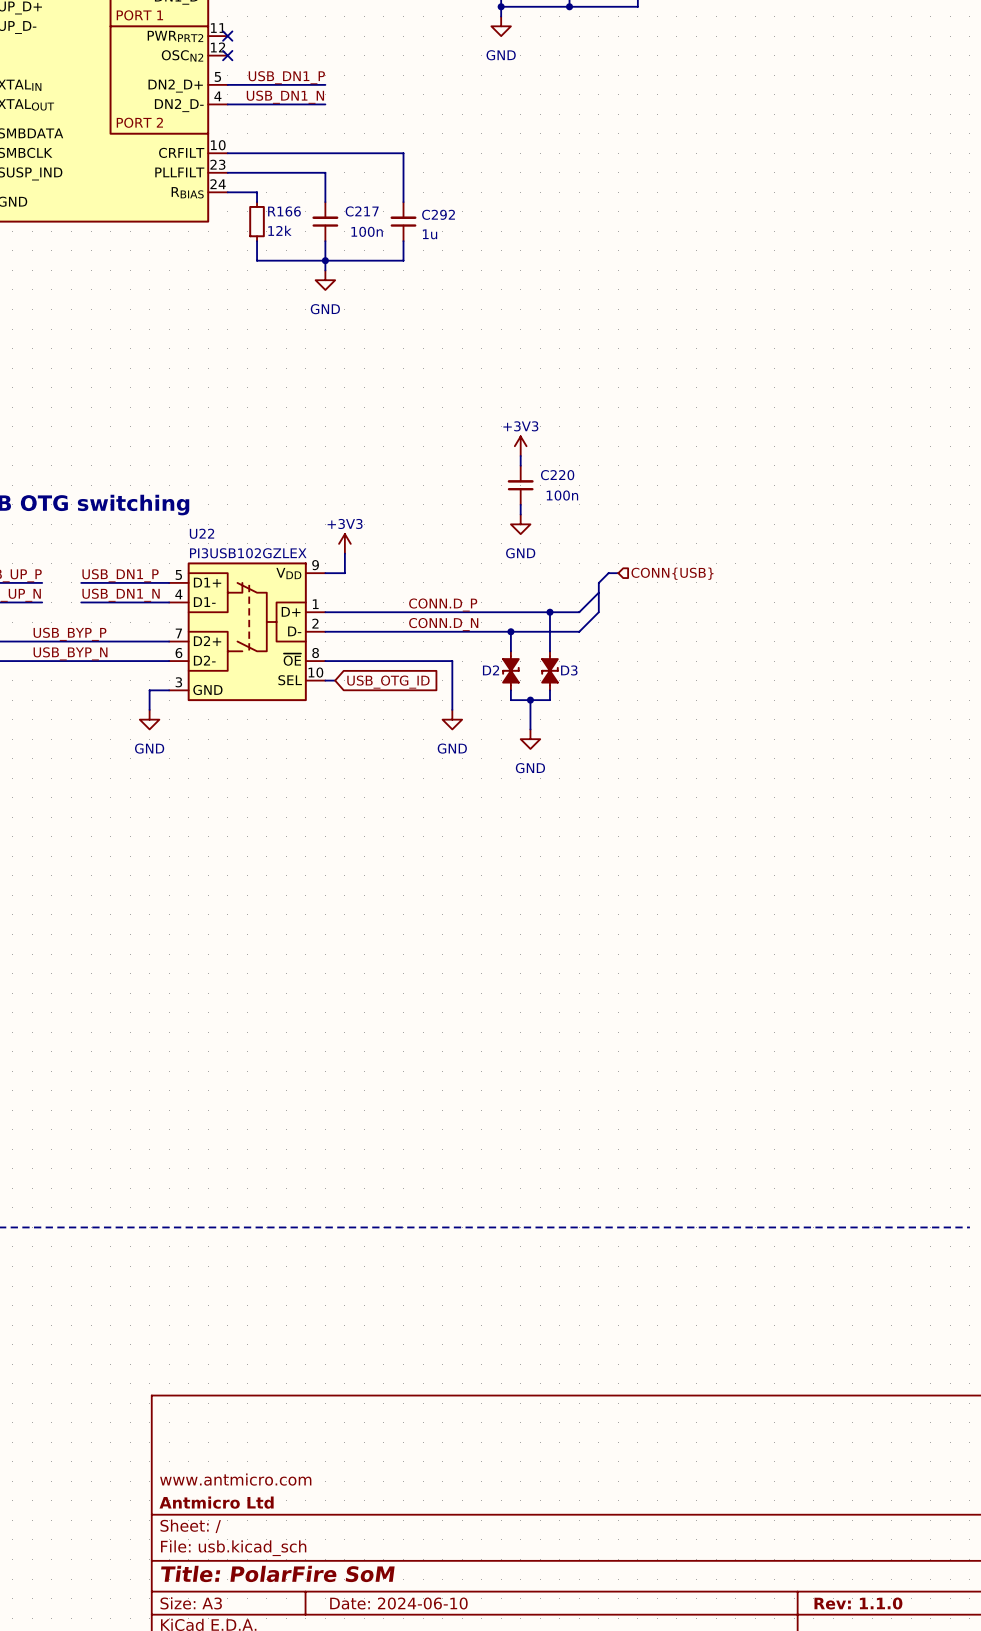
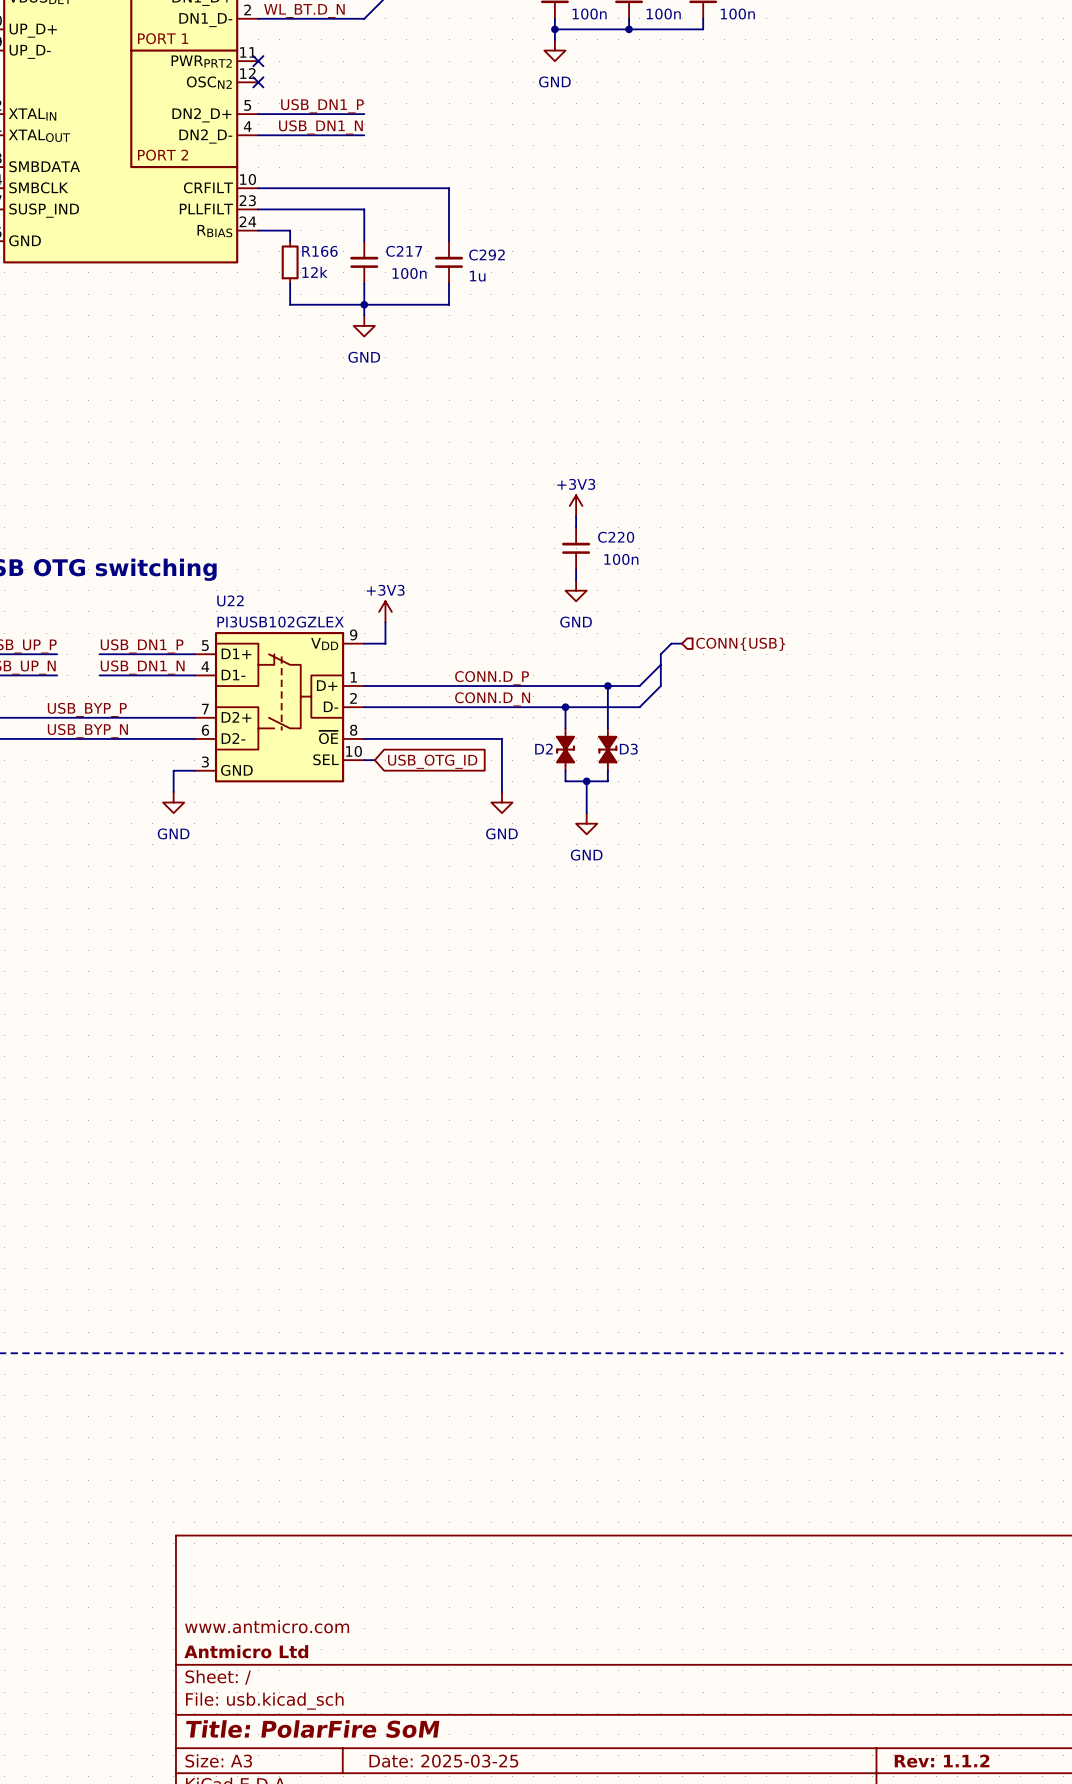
title block: Date: 2024-06-10 (398, 1603) -> Date: 2025-03-25 (443, 1761)
title block: Rev: 1.1.0 (858, 1603) -> Rev: 1.1.2 (942, 1761)

